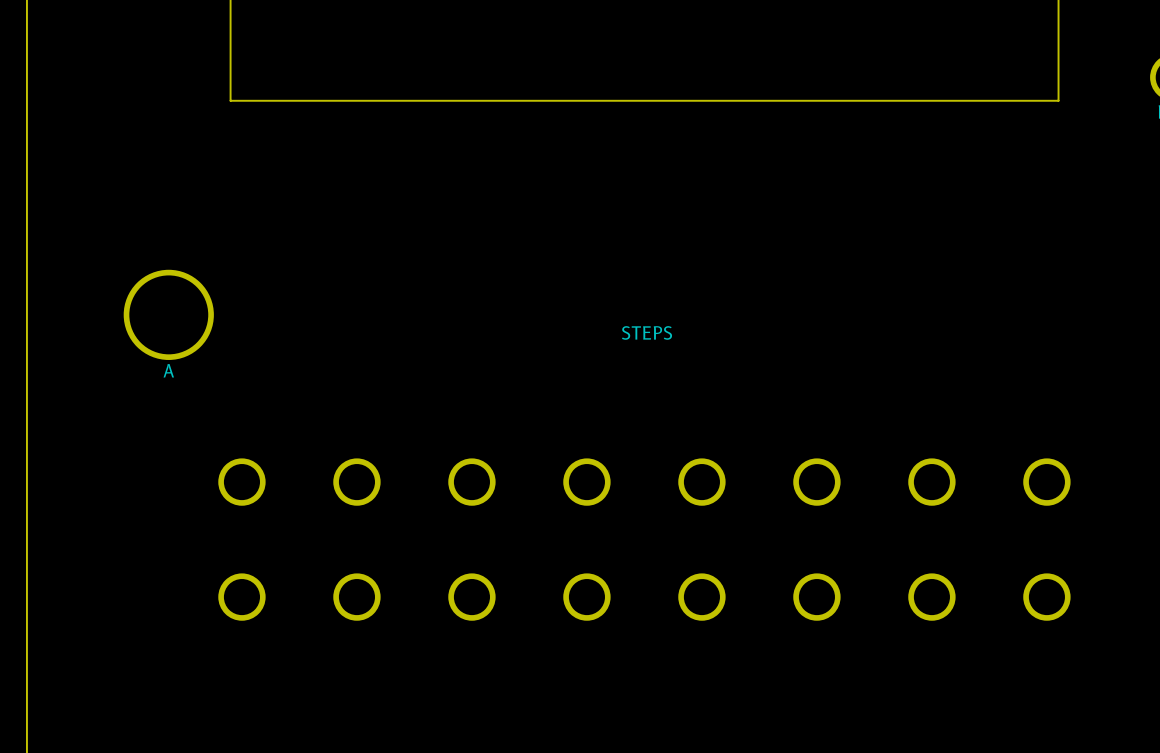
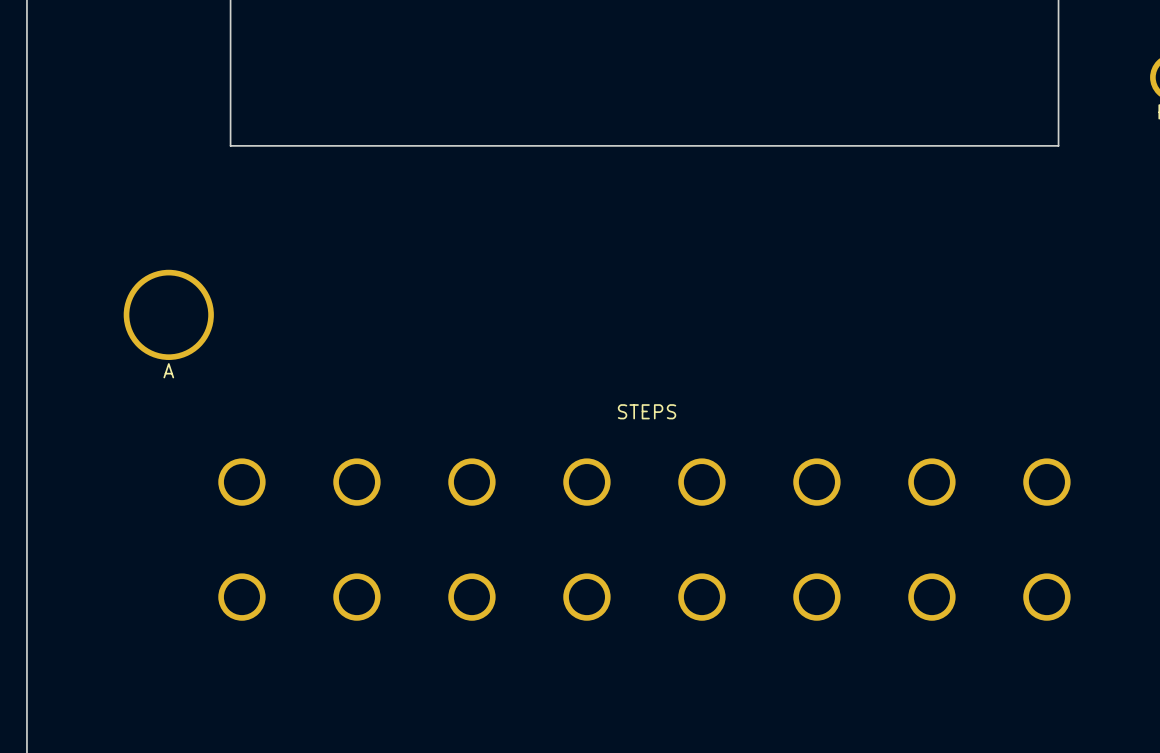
board edge: (230, 100) (1058, 100) -> (230, 100) (230, 145) (1058, 145) (1058, 100)
text position: STEPS (646, 332) -> STEPS (647, 411)

